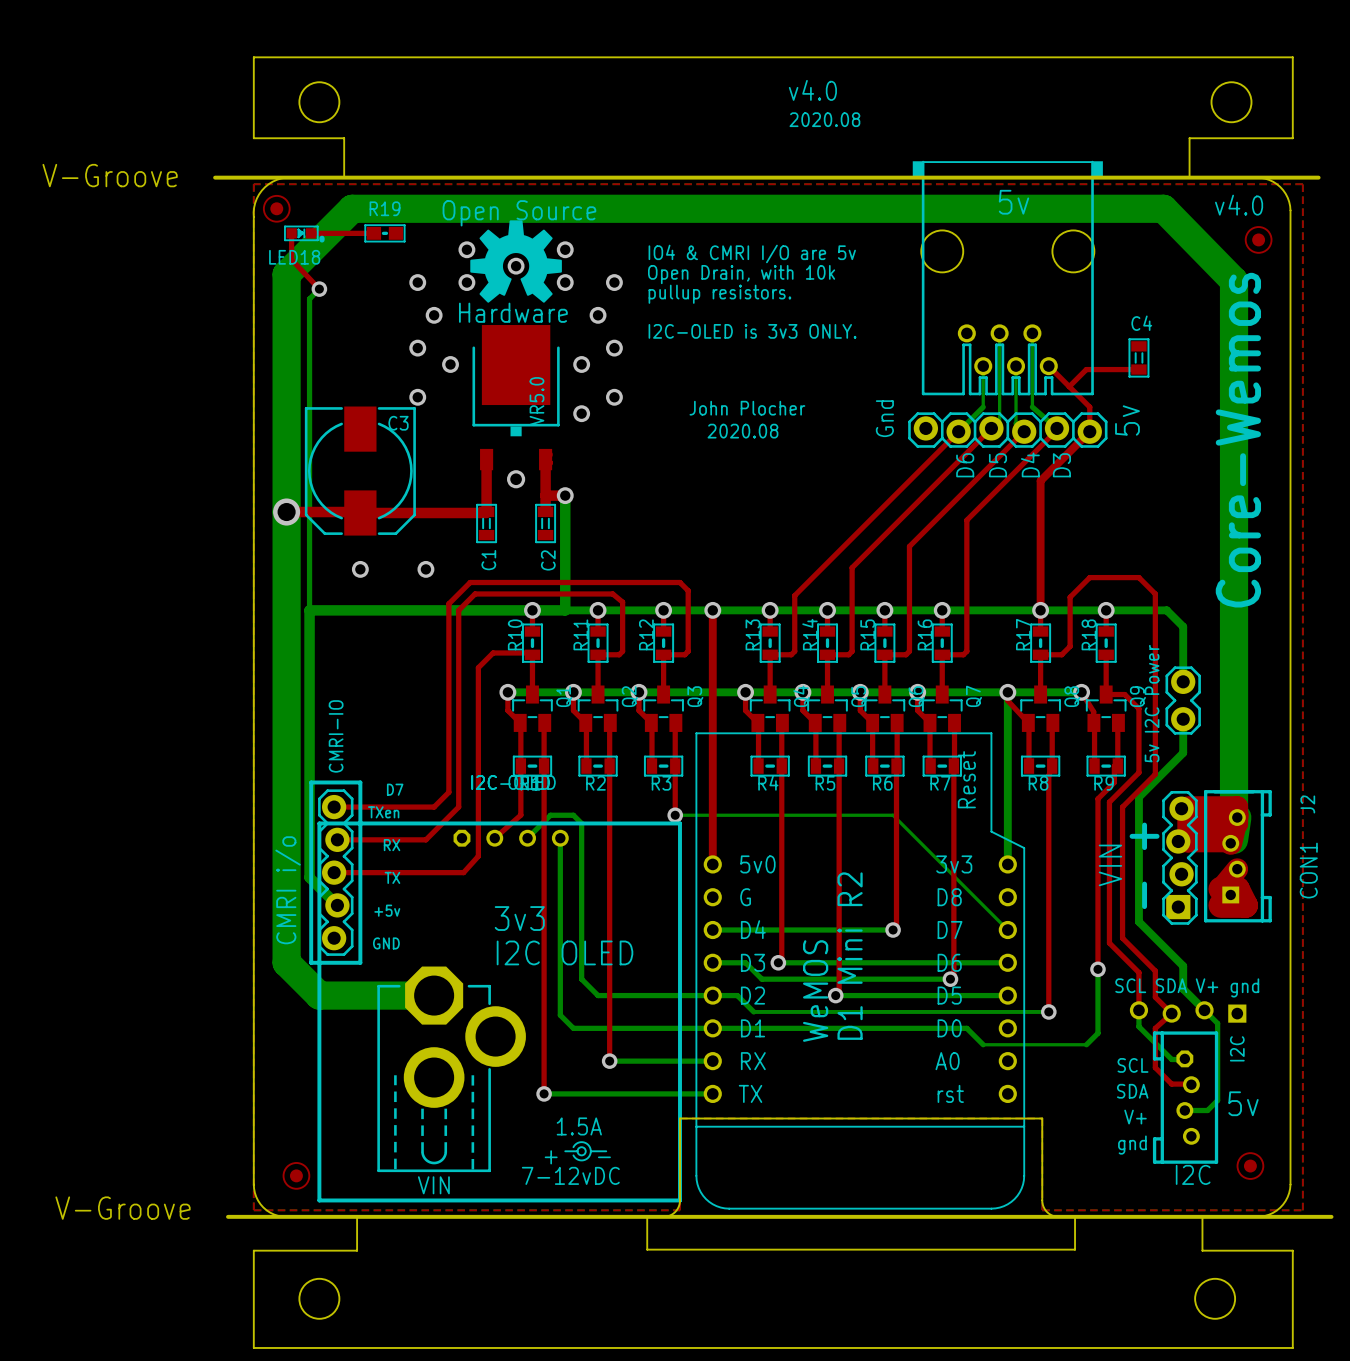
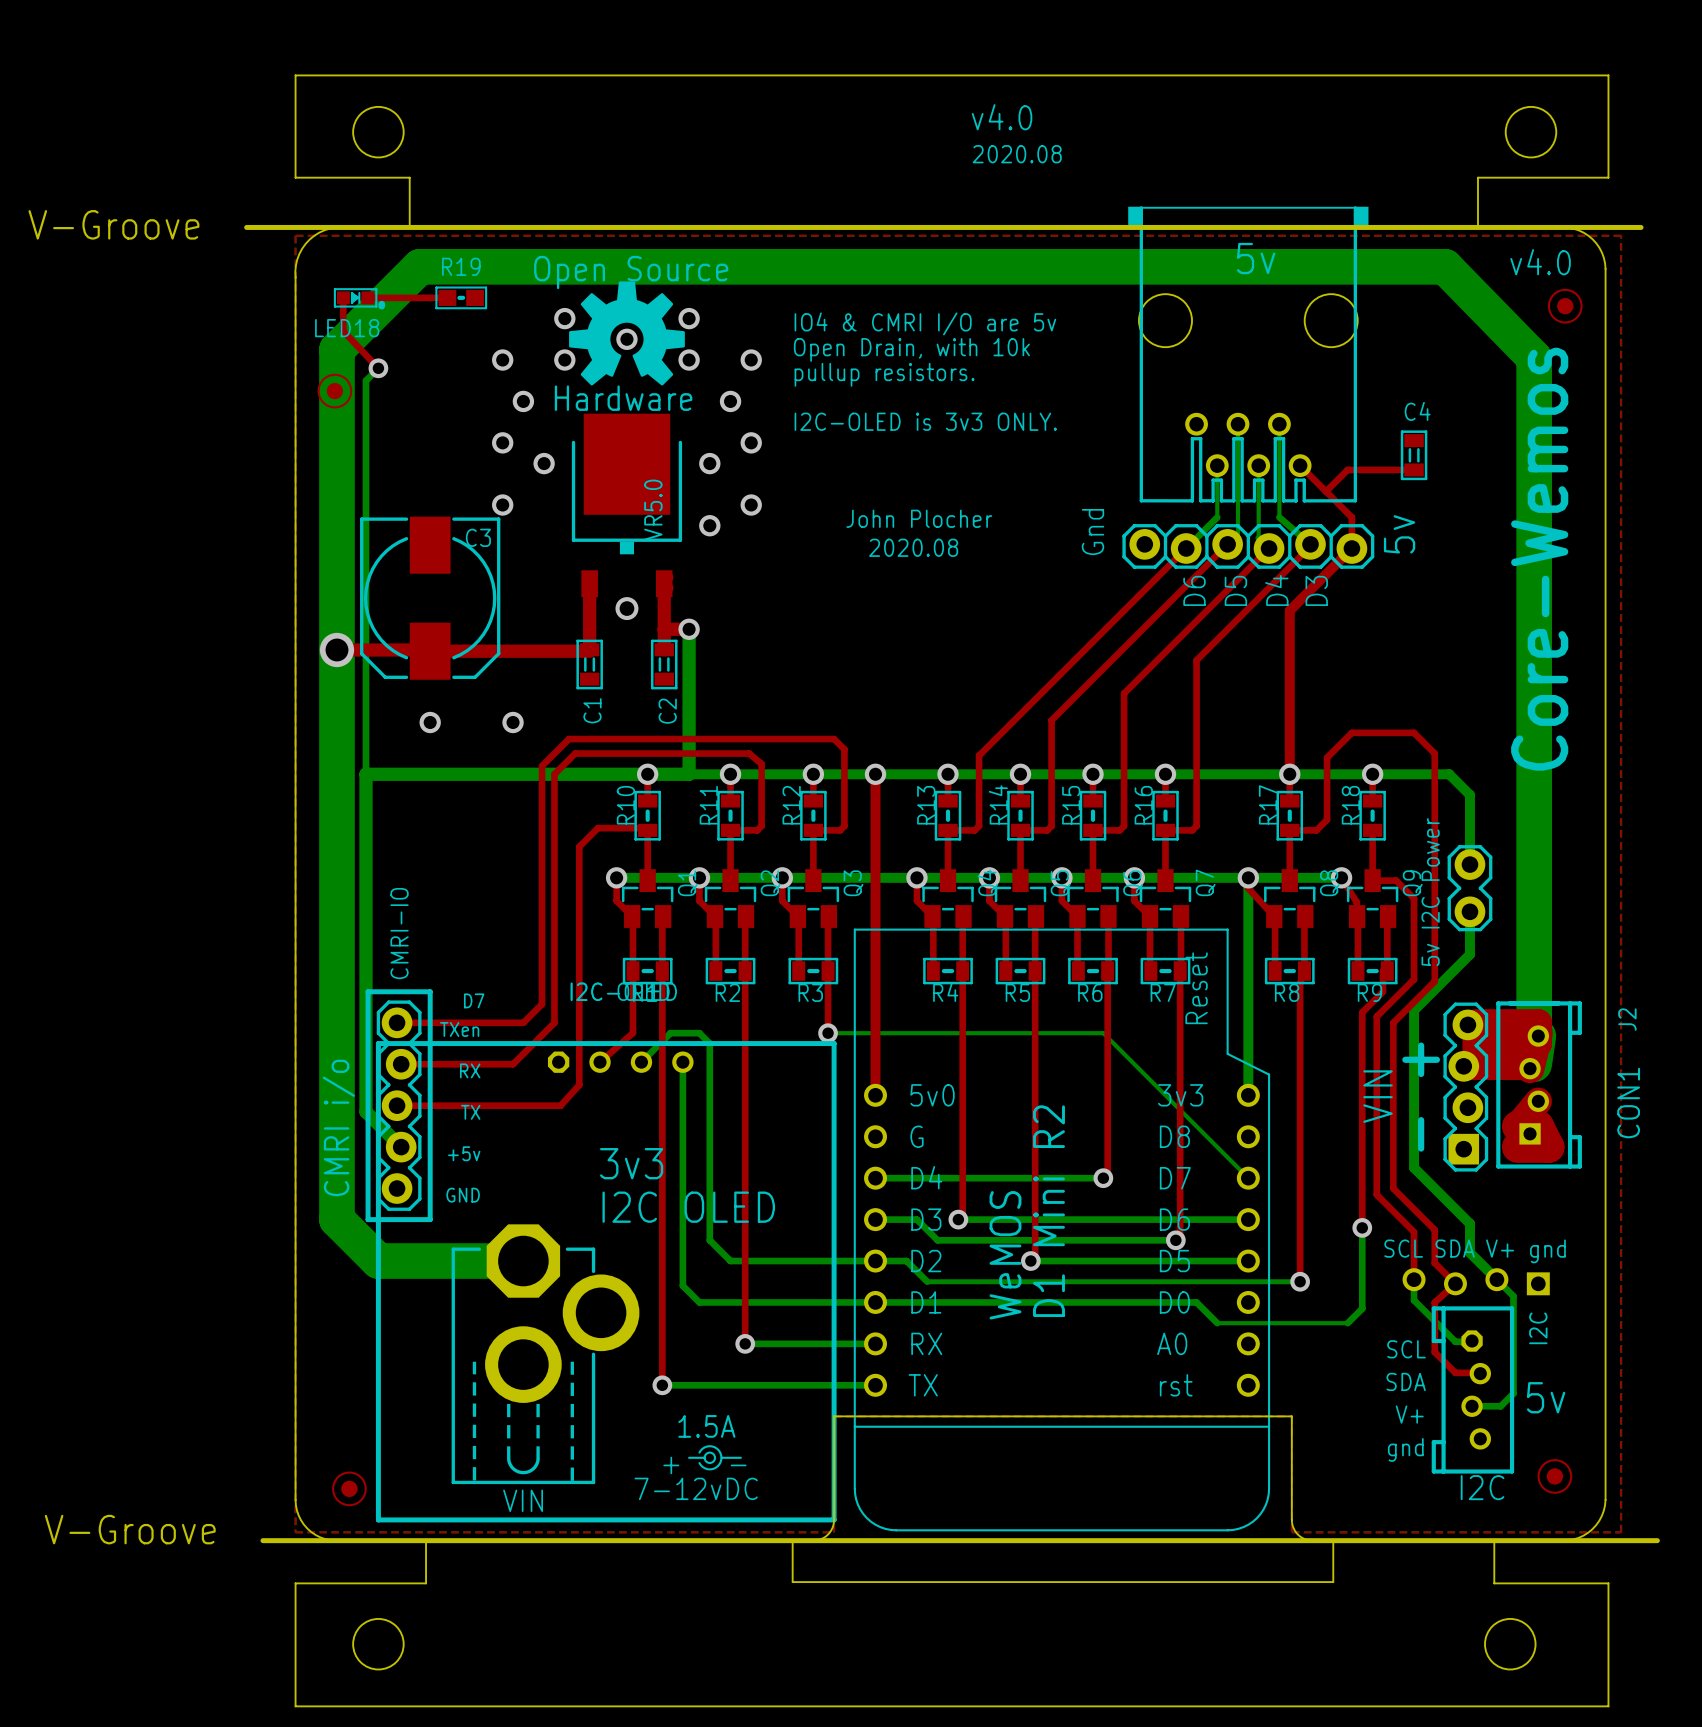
part position: (276, 208) -> (334, 391)

